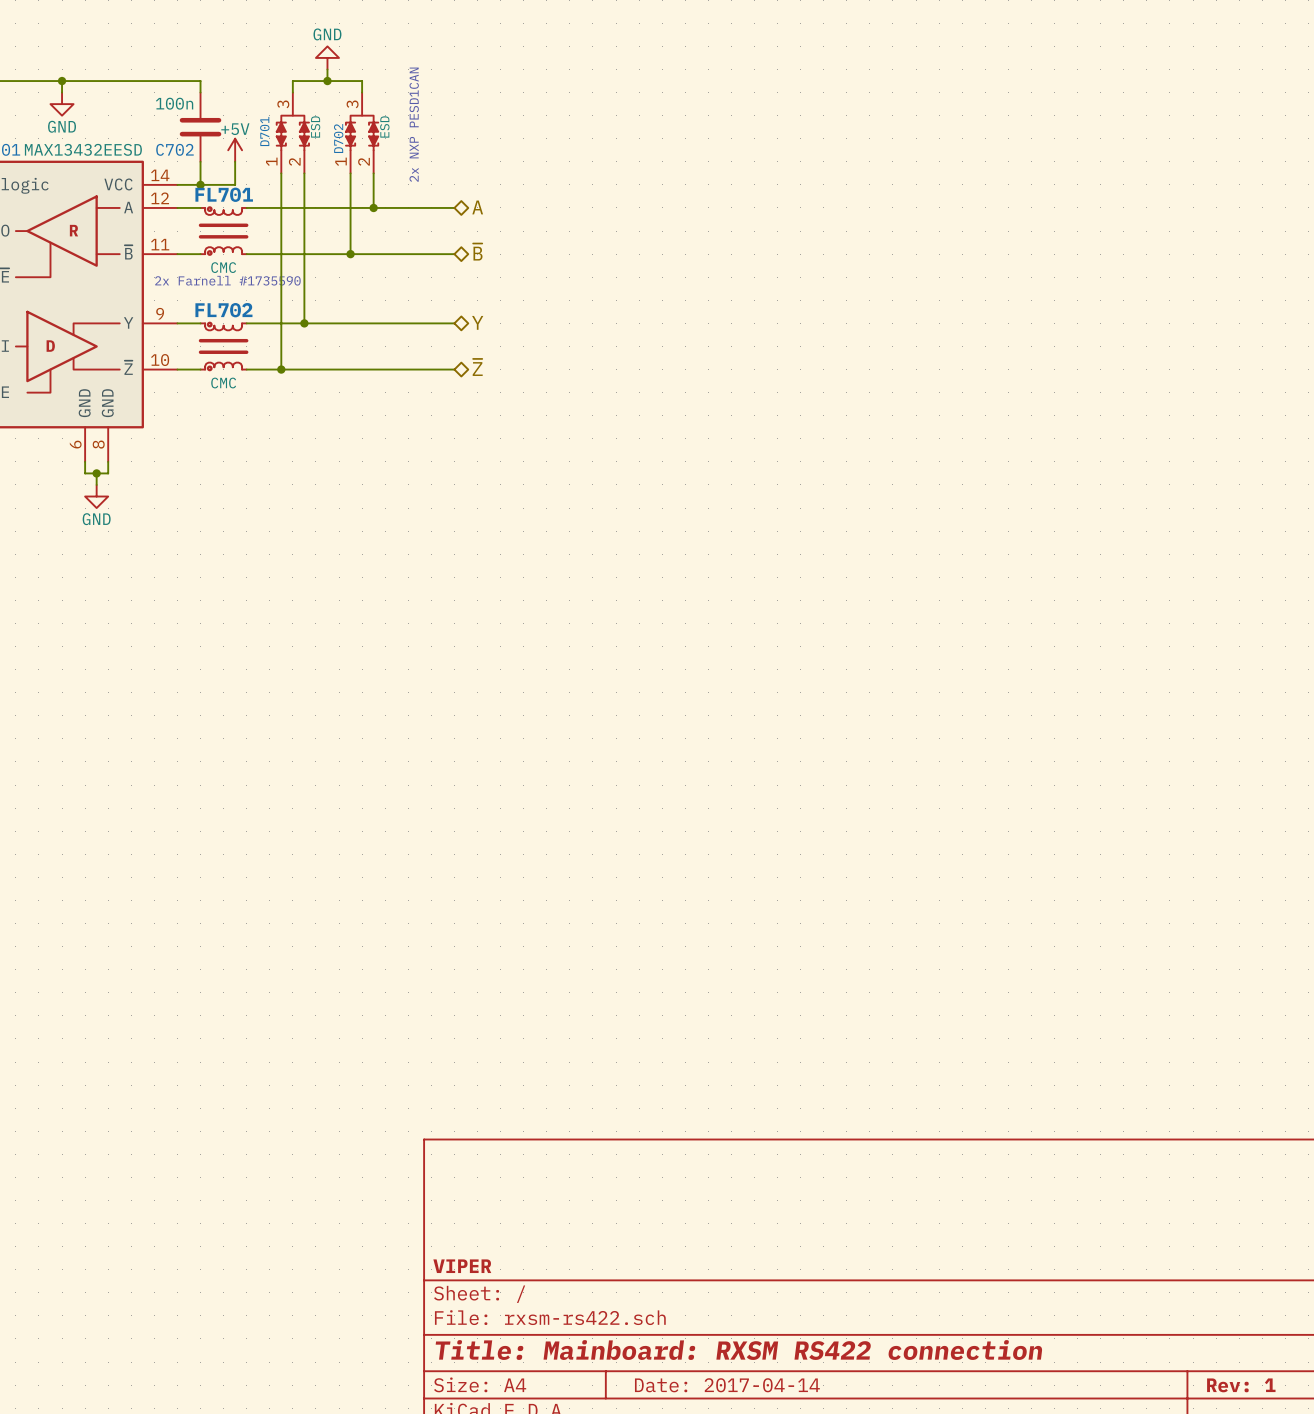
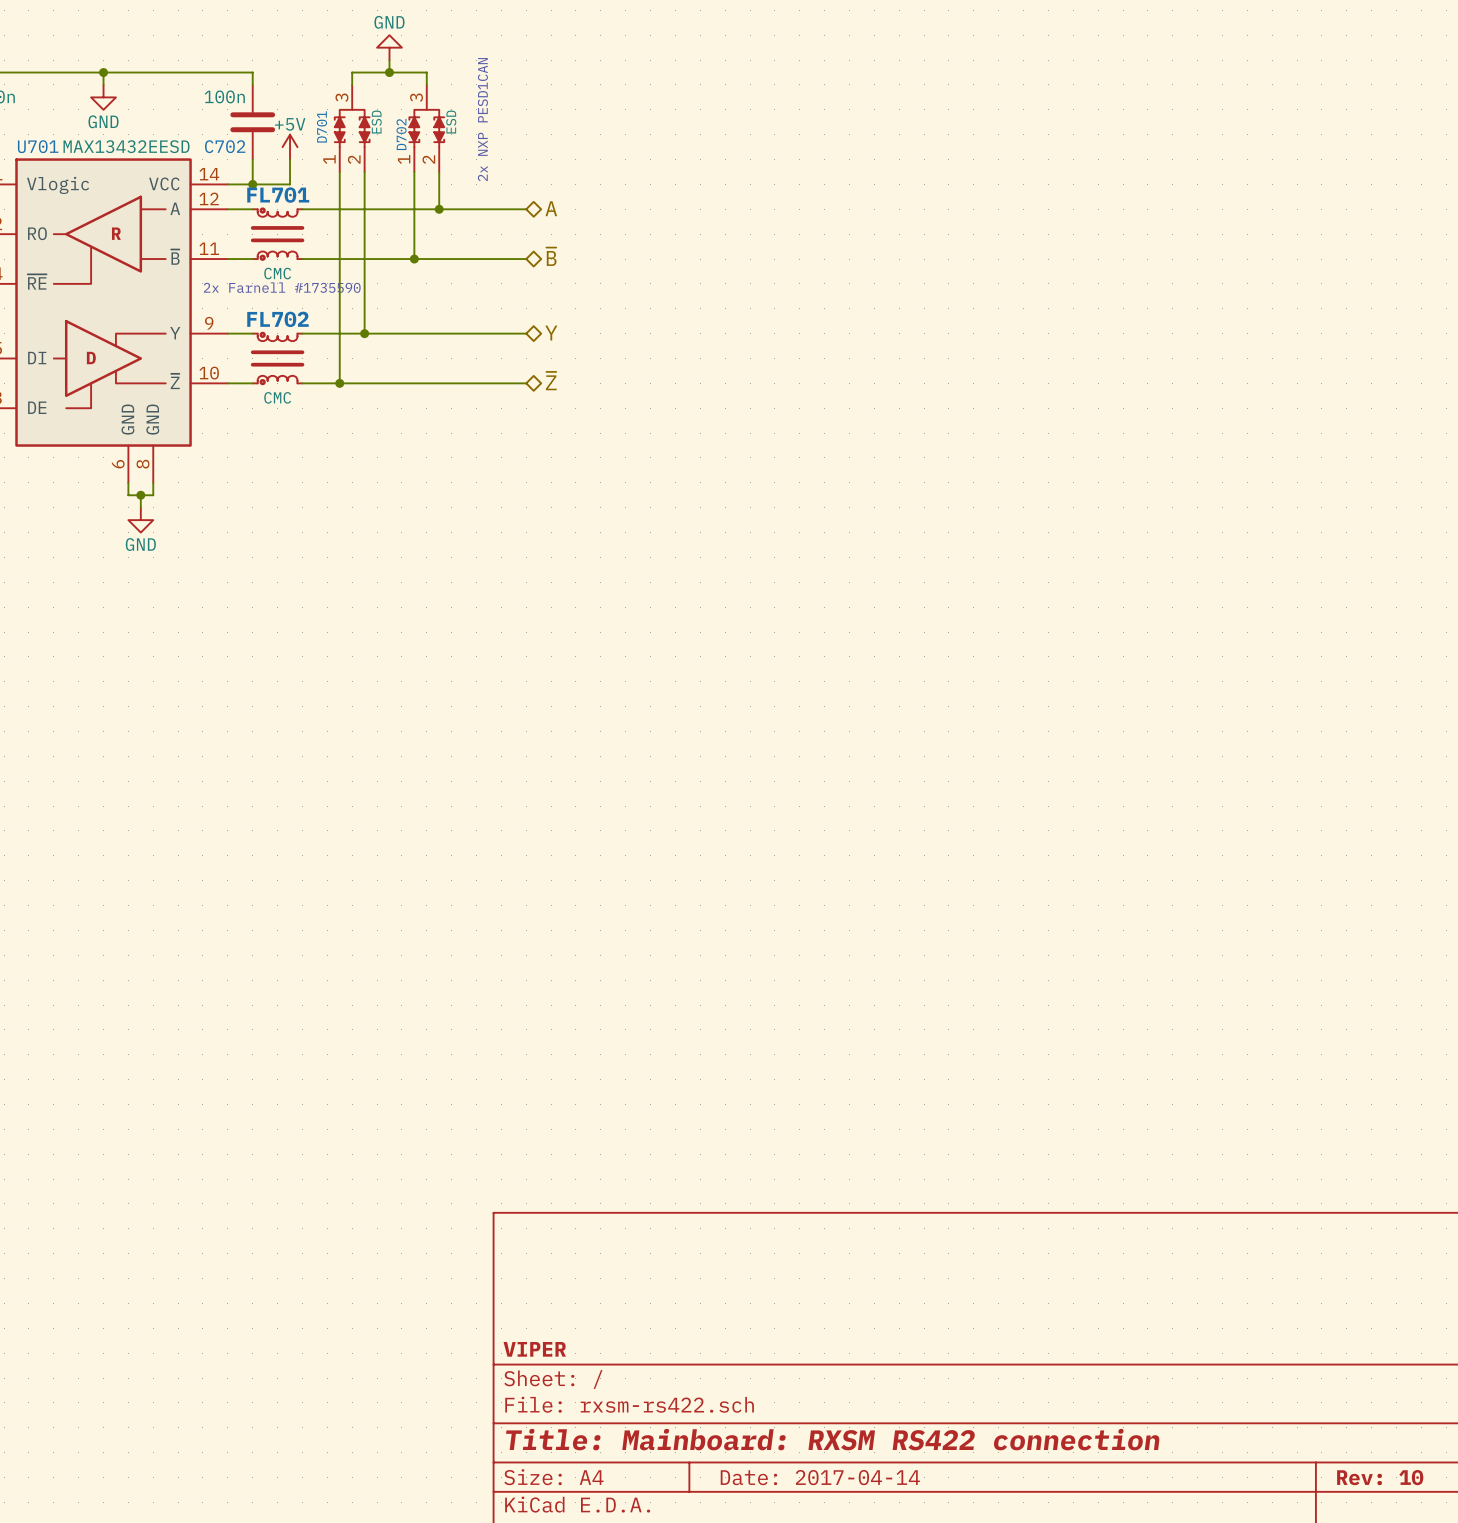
title block: Rev: 1 (1241, 1385) -> Rev: 10 (1380, 1477)

